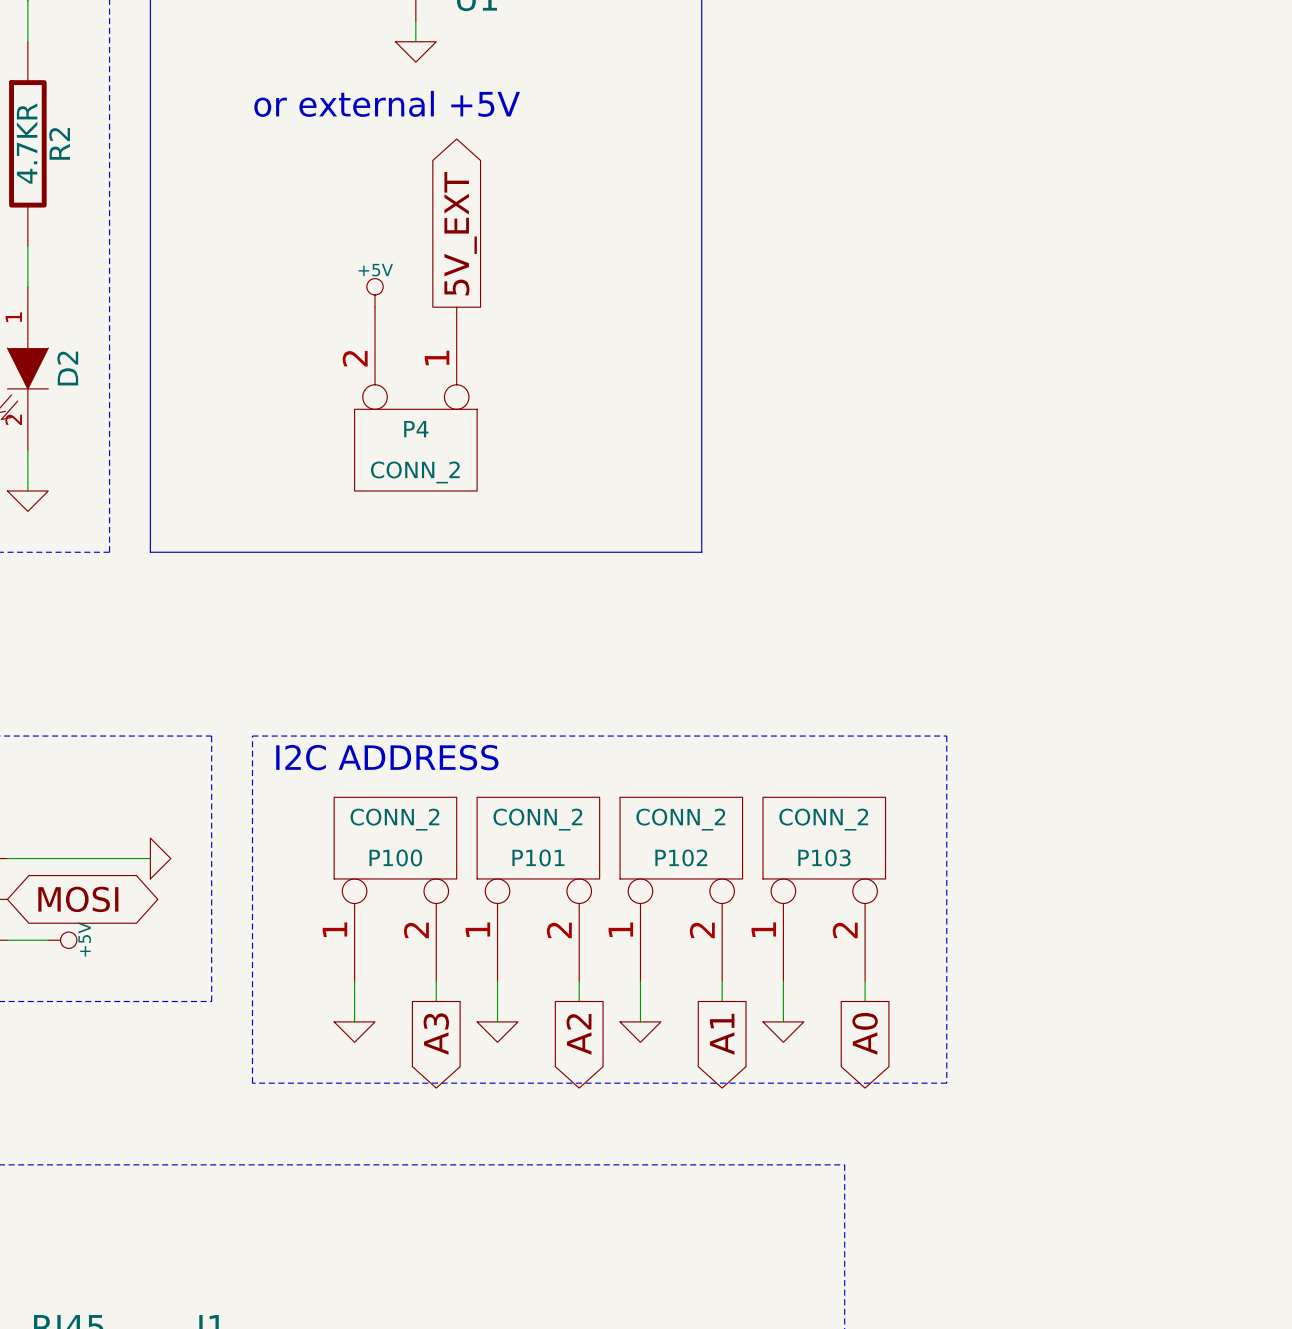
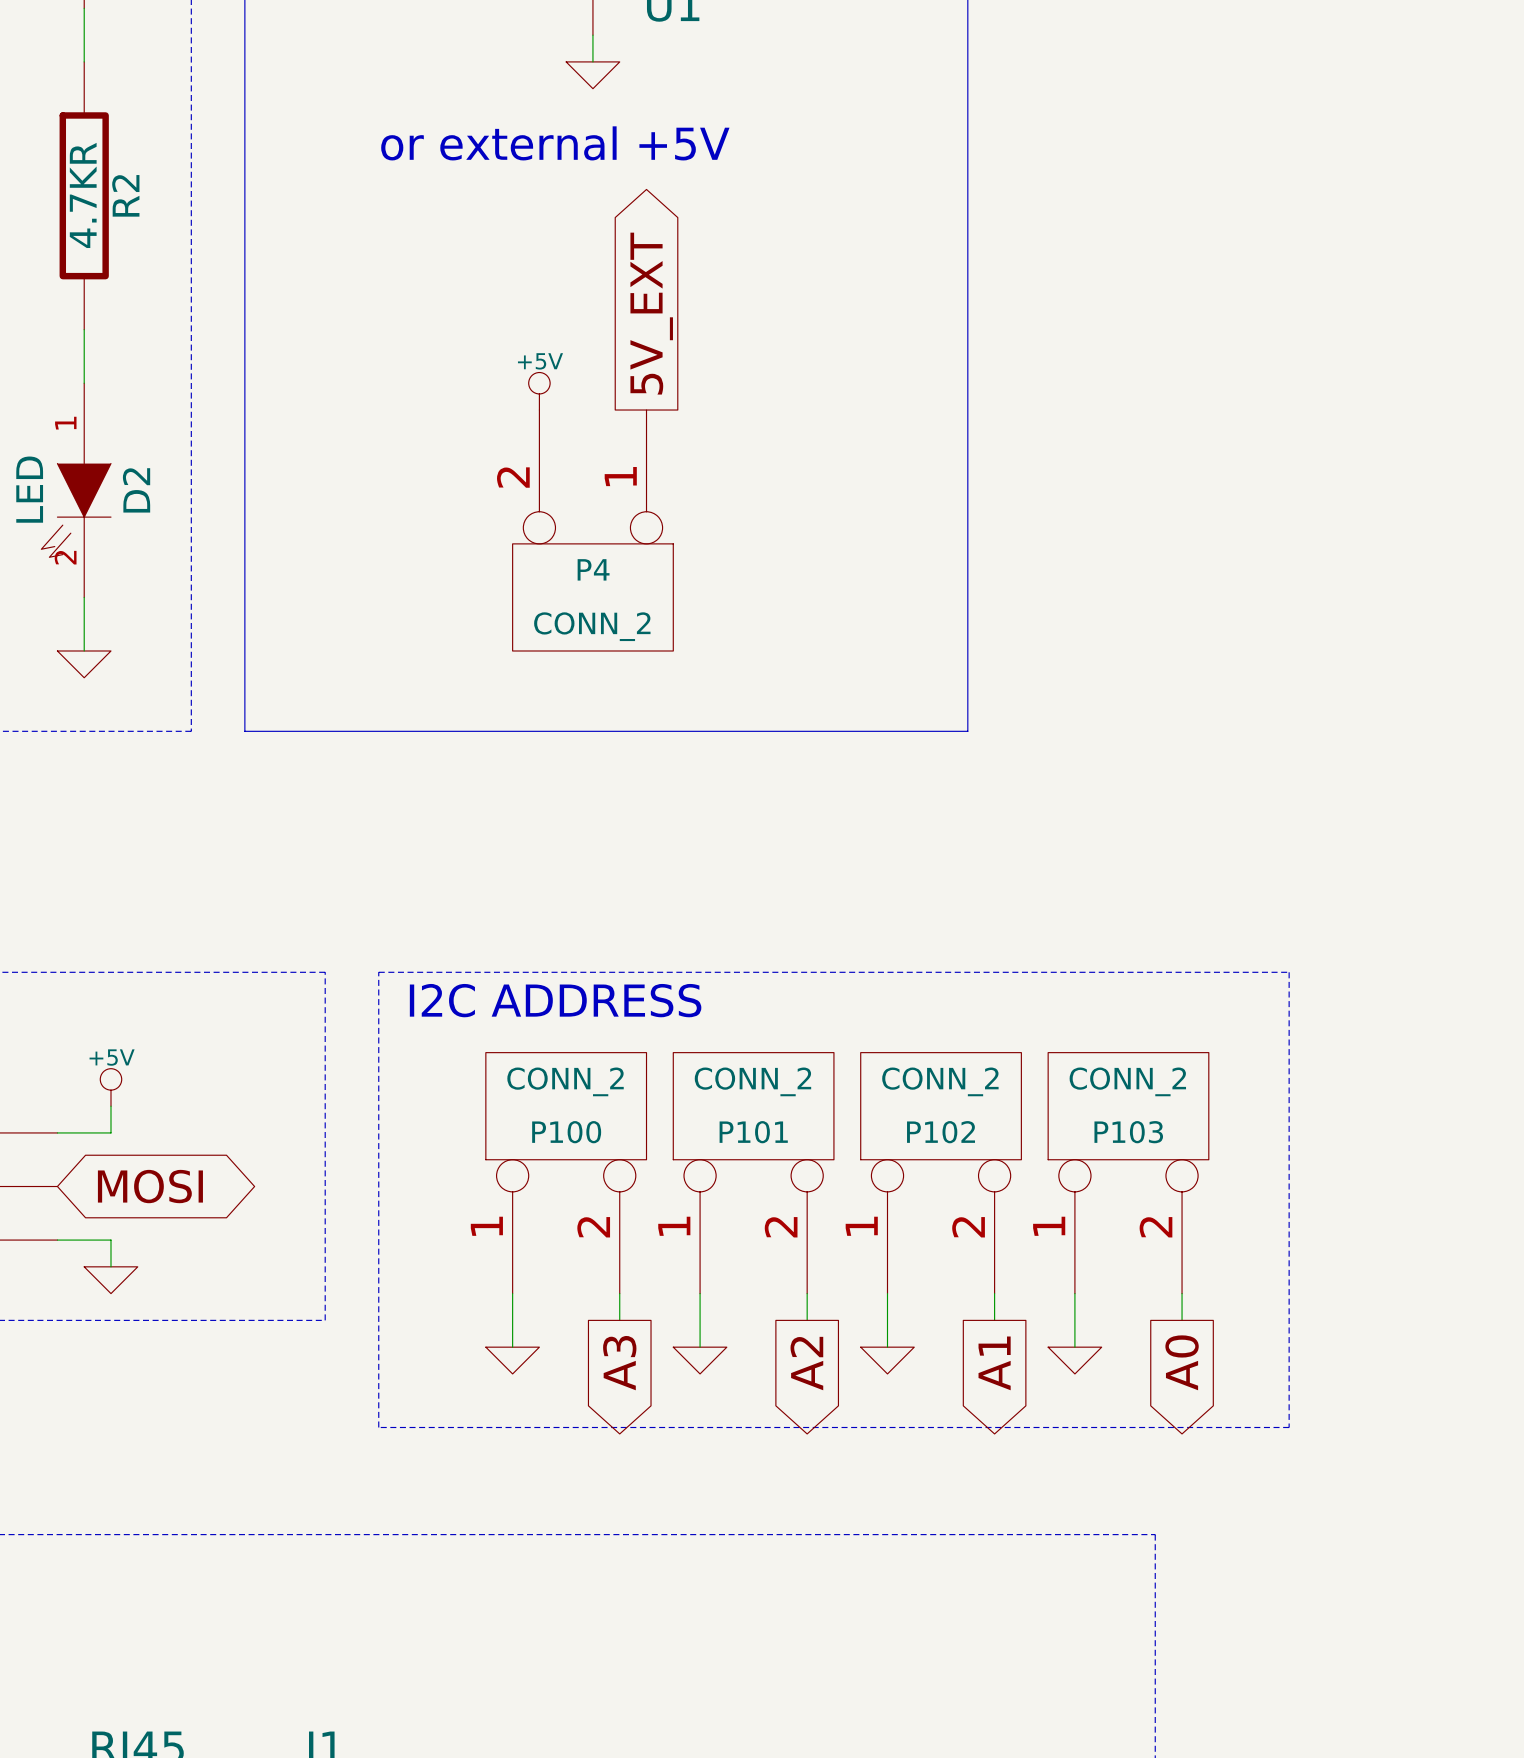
wire: (48, 858) (150, 858) -> (110, 1132) (110, 1106)
power symbol rotation: 0° (160, 858) -> 90° clockwise (110, 1280)
power symbol position: (160, 858) -> (110, 1280)
wire: none -> (110, 1240) (110, 1266)
power symbol rotation: 0° (62, 940) -> 90° counterclockwise (110, 1087)
power symbol position: +5V (62, 940) -> +5V (110, 1087)

